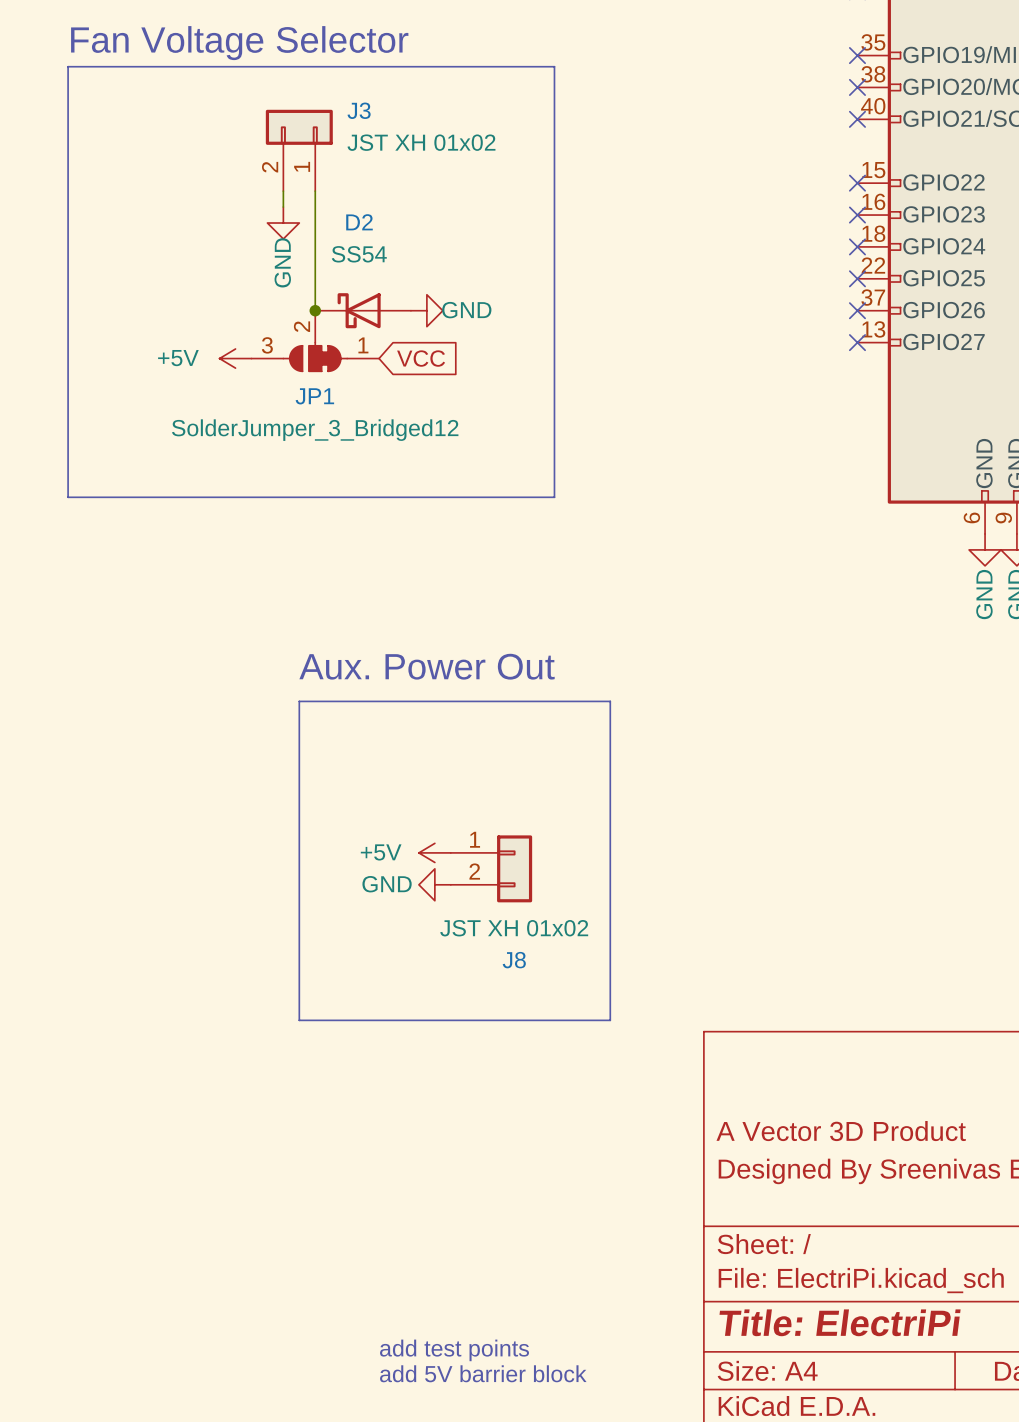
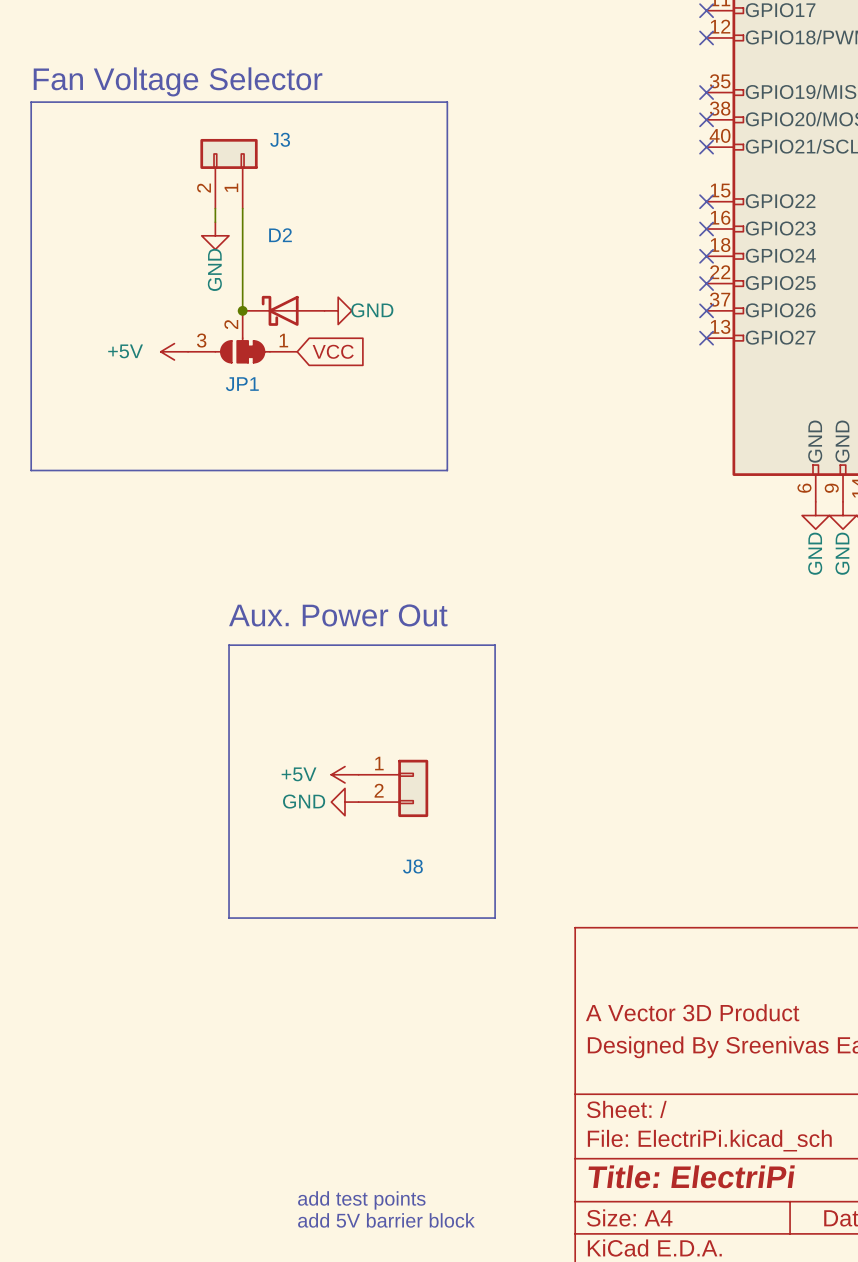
J3 value: JST XH 01x02 (421, 142) -> none
D2 value: SS54 (359, 254) -> none
JP1 value: SolderJumper_3_Bridged12 (315, 430) -> none
J8 value: JST XH 01x02 (514, 928) -> none

